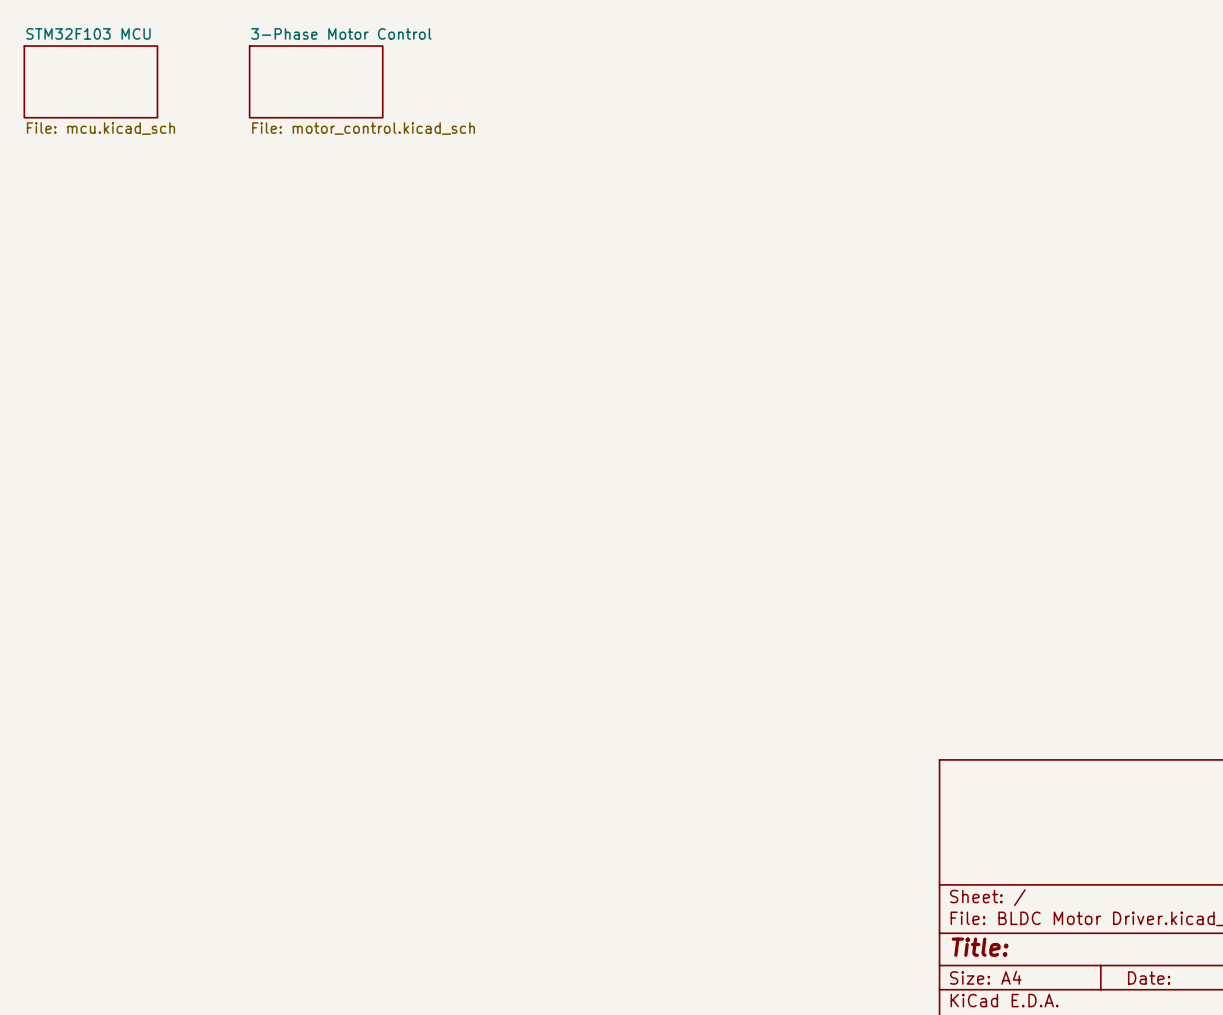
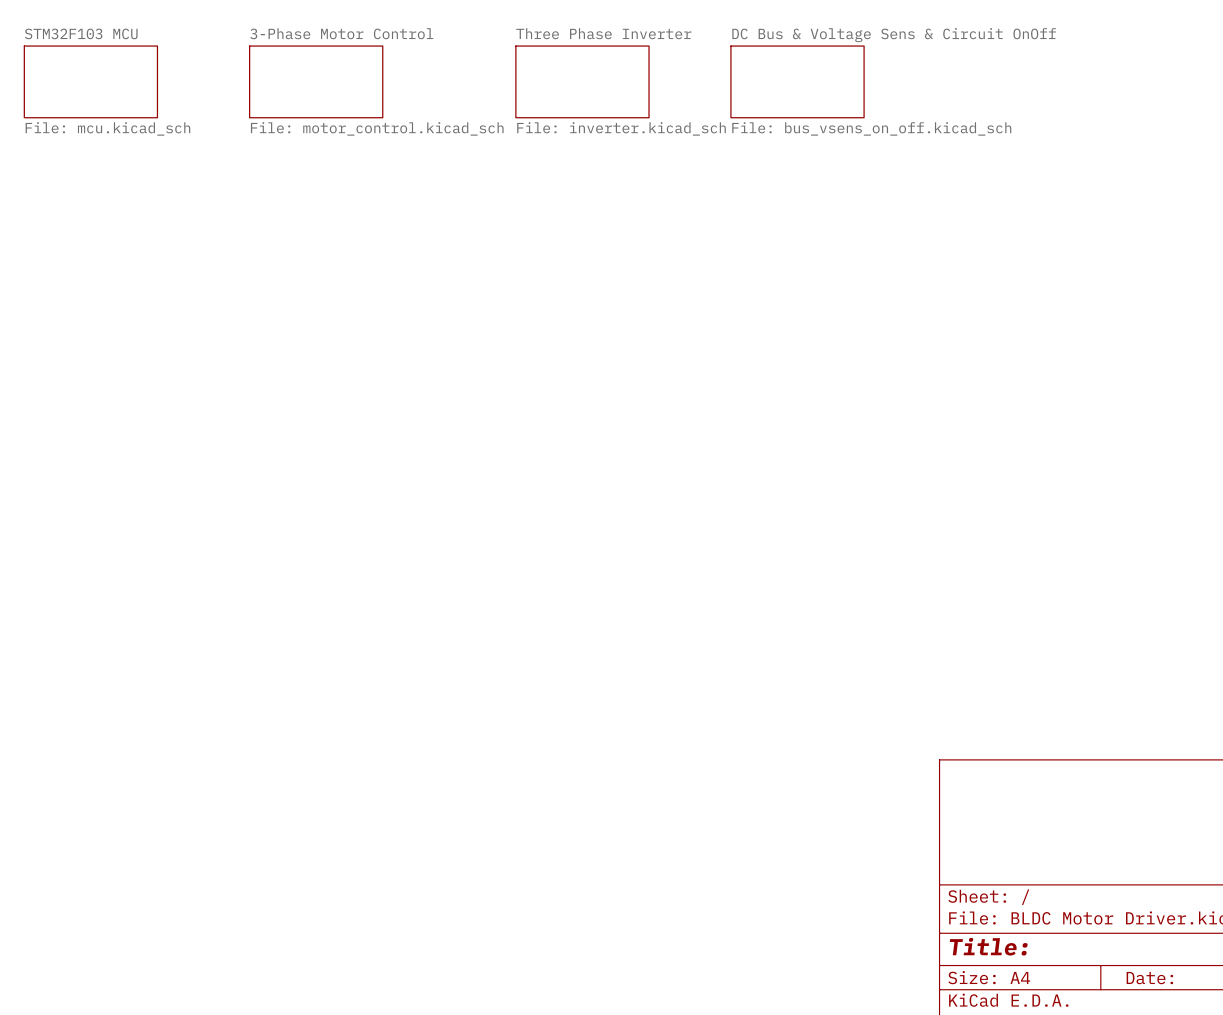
sheet Three Phase Inverter: none -> File: inverter.kicad_sch (582, 81)
sheet DC Bus & Voltage Sens & Circuit OnOff: none -> File: bus_vsens_on_off.kicad_sch (797, 81)

